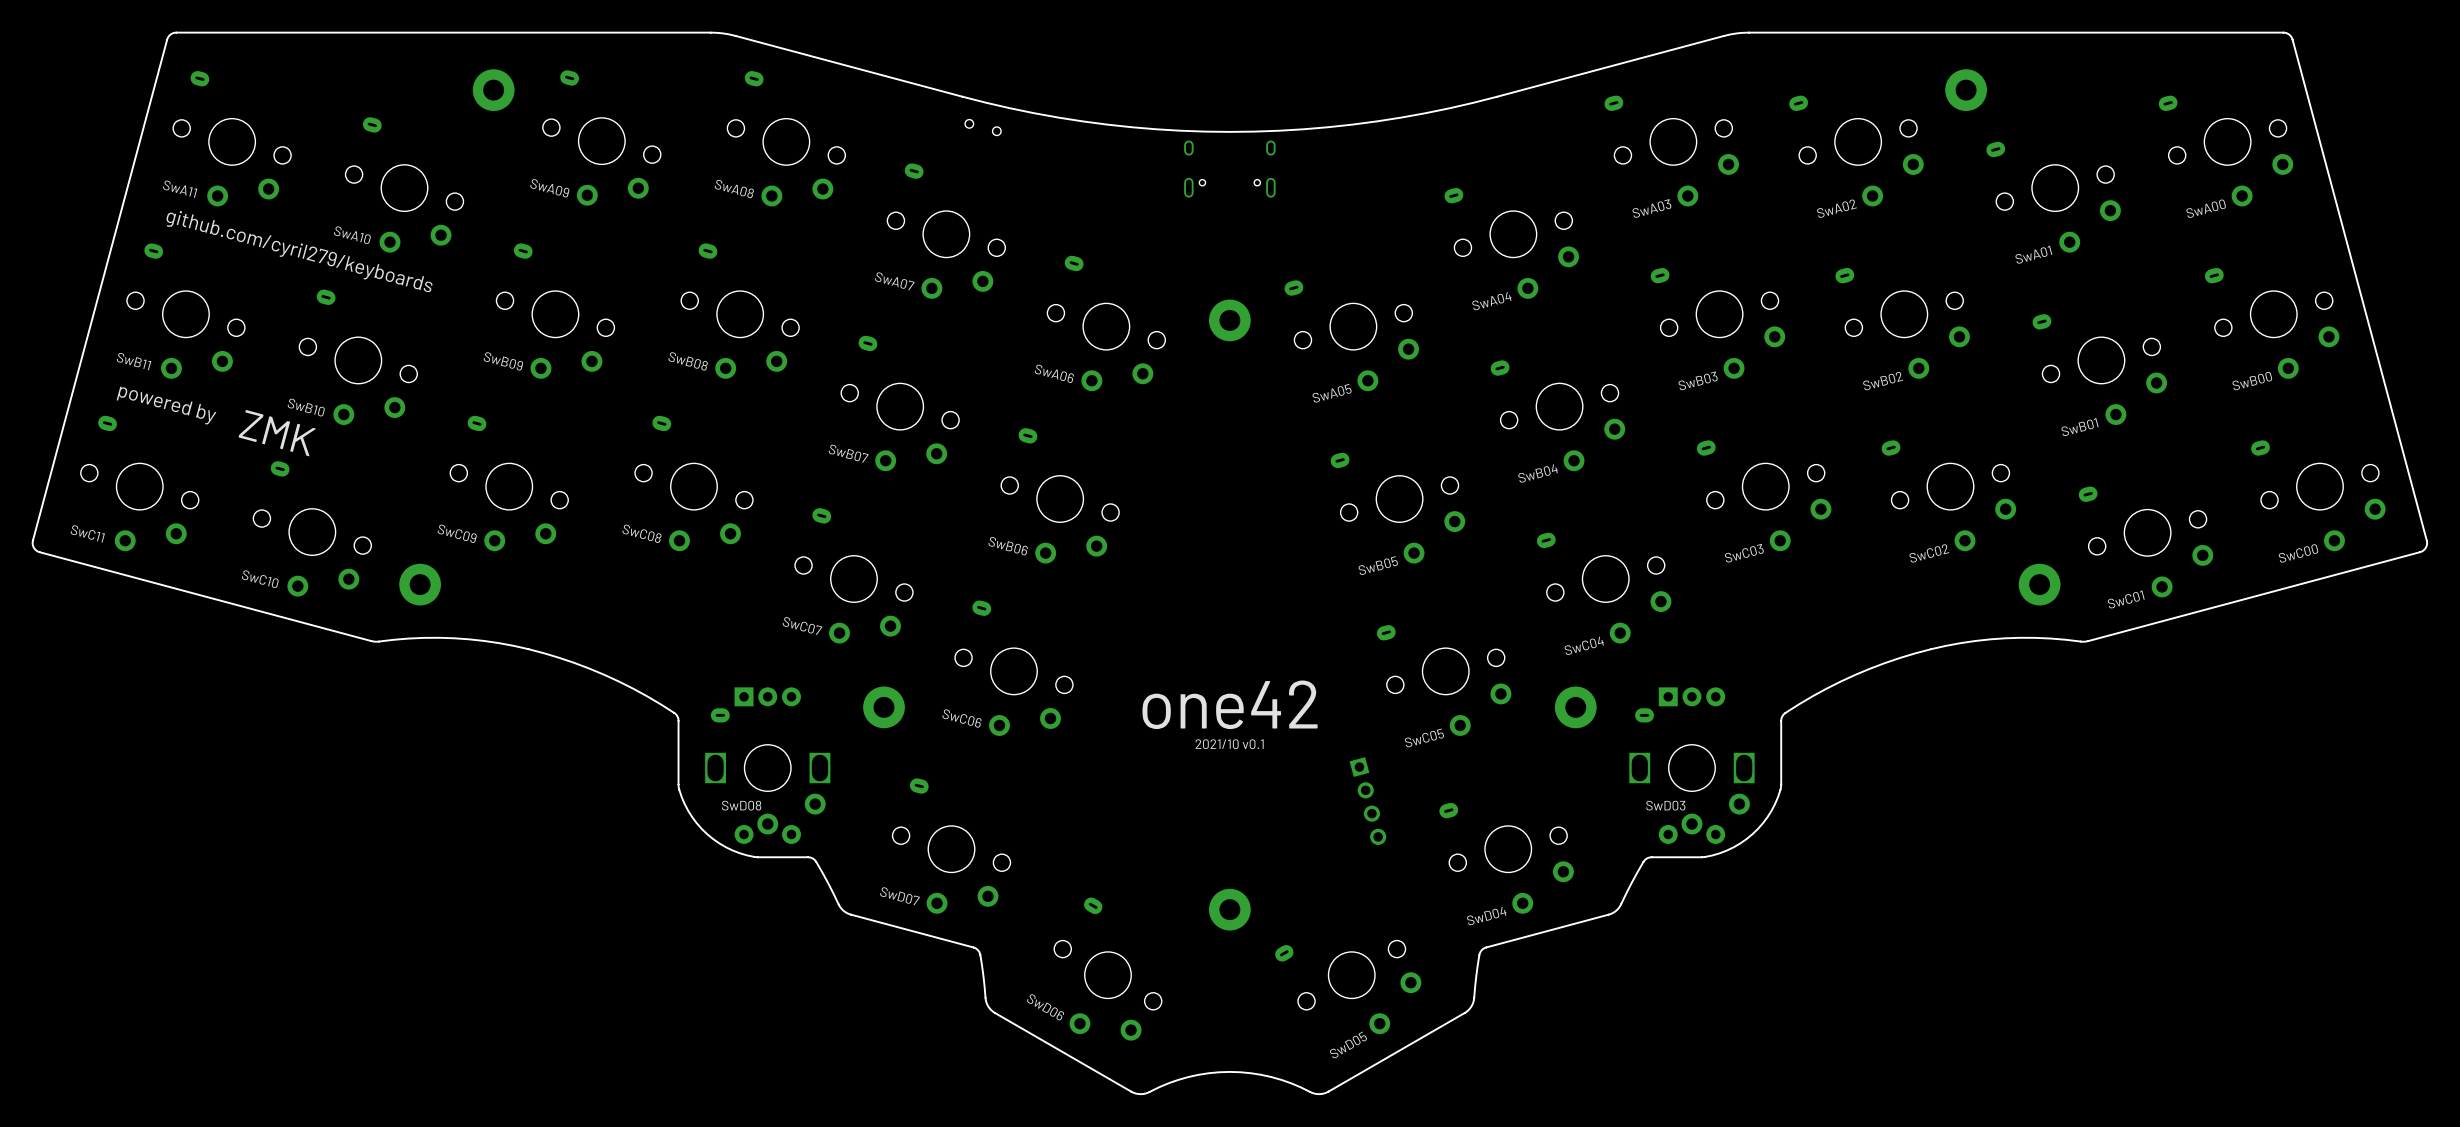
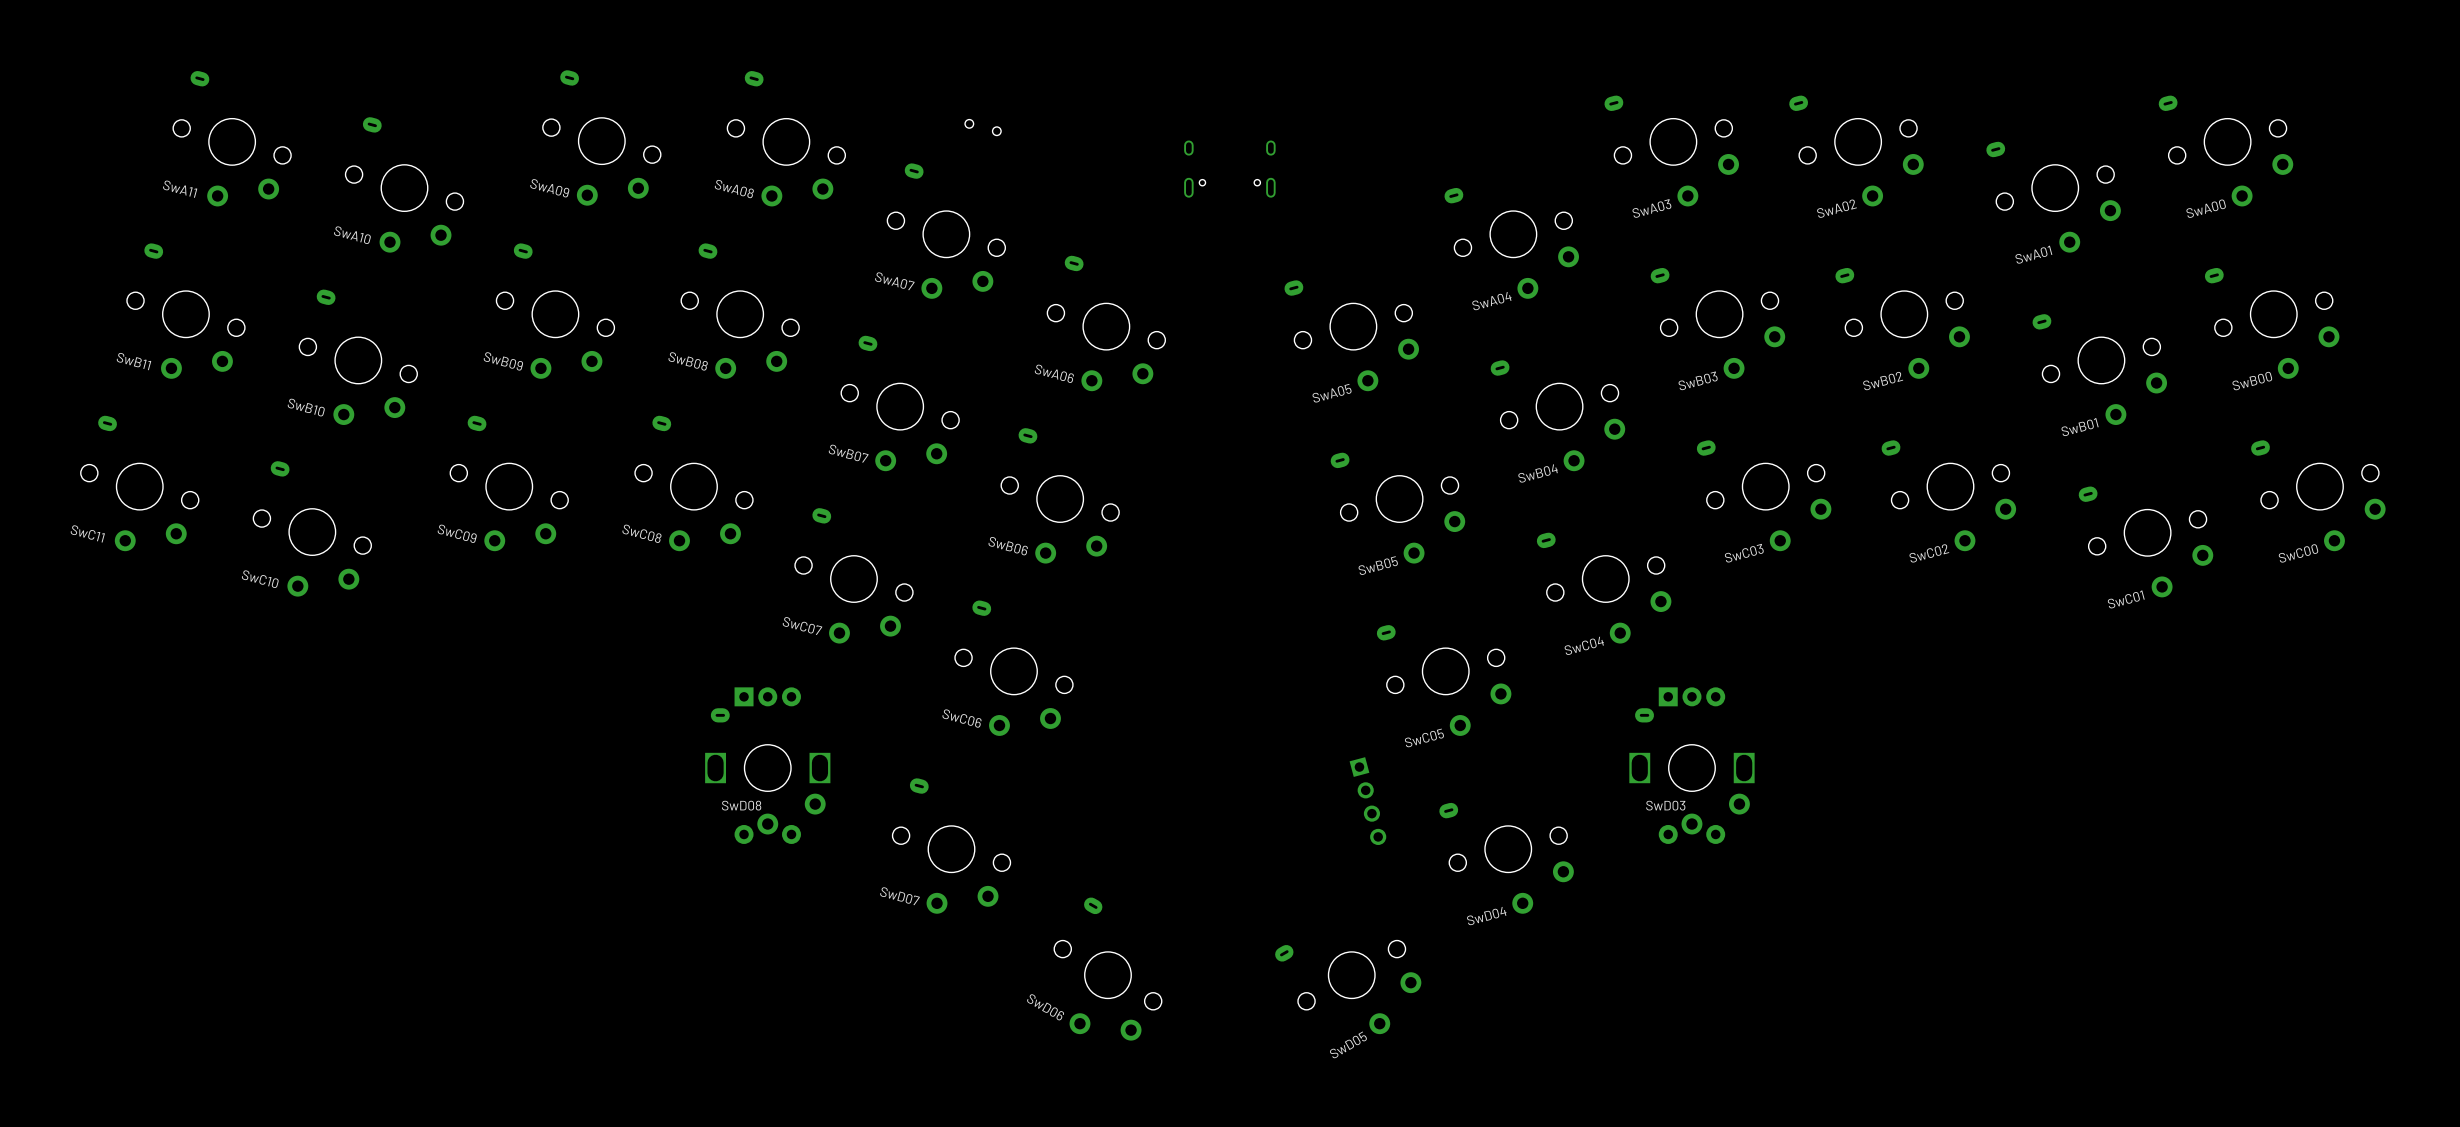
drawing: [31, 31, 2429, 1096] -> none
part: (493, 90) -> none
part: (1966, 90) -> none
part: (1229, 320) -> none
part: (420, 584) -> none
part: (2039, 584) -> none
part: (884, 707) -> none
part: (1575, 707) -> none
part: (1229, 909) -> none

